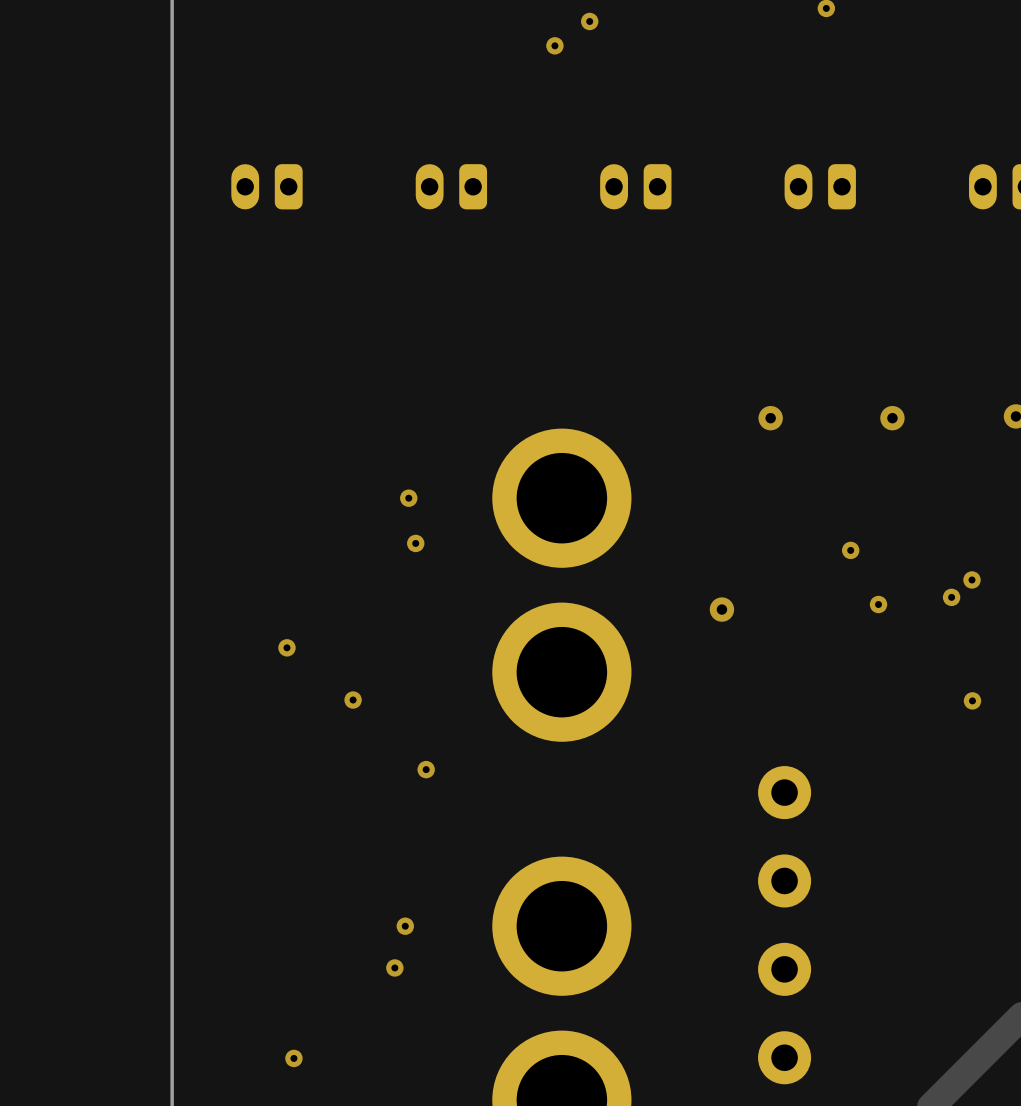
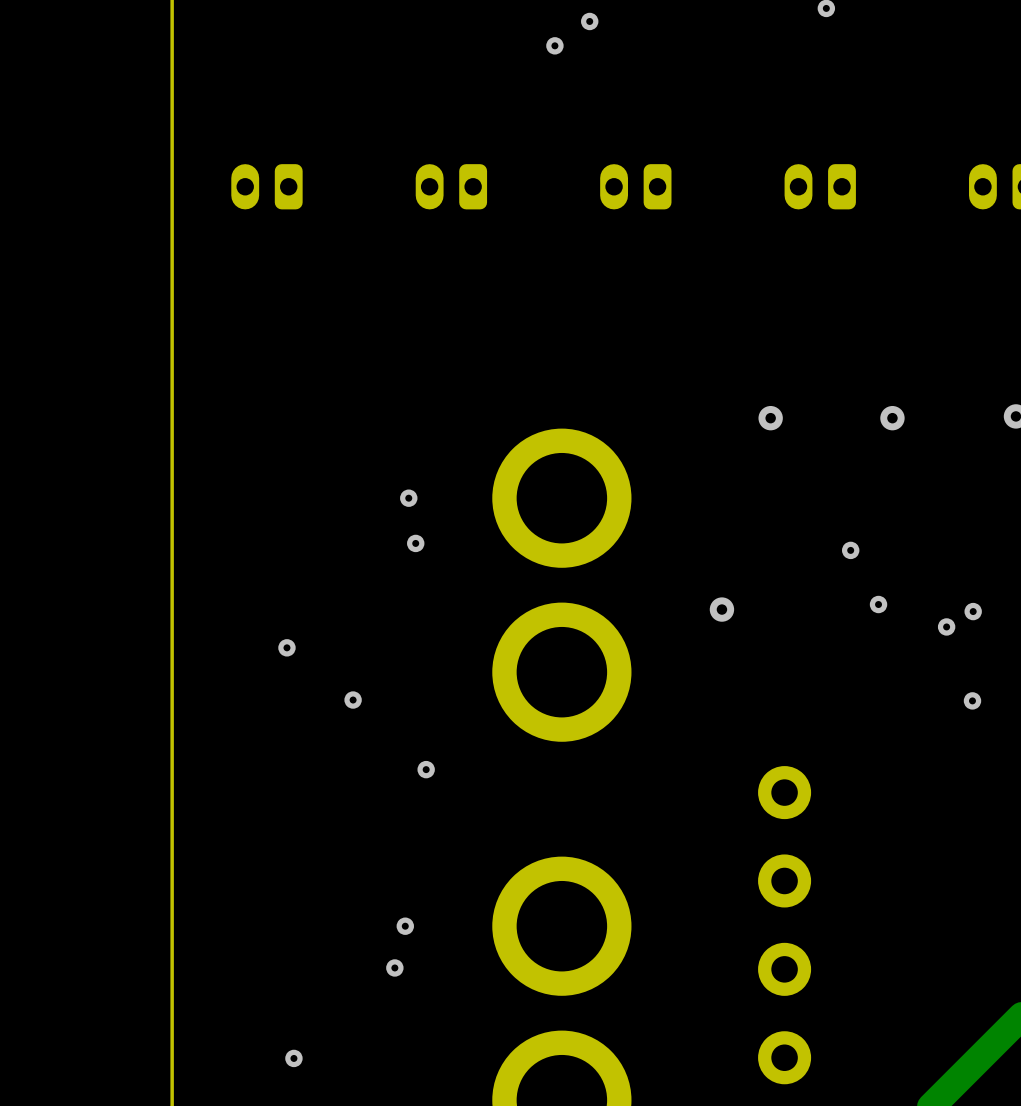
via: (972, 579) -> none
via: (951, 597) -> none
via: none -> (973, 611)
via: none -> (946, 626)

